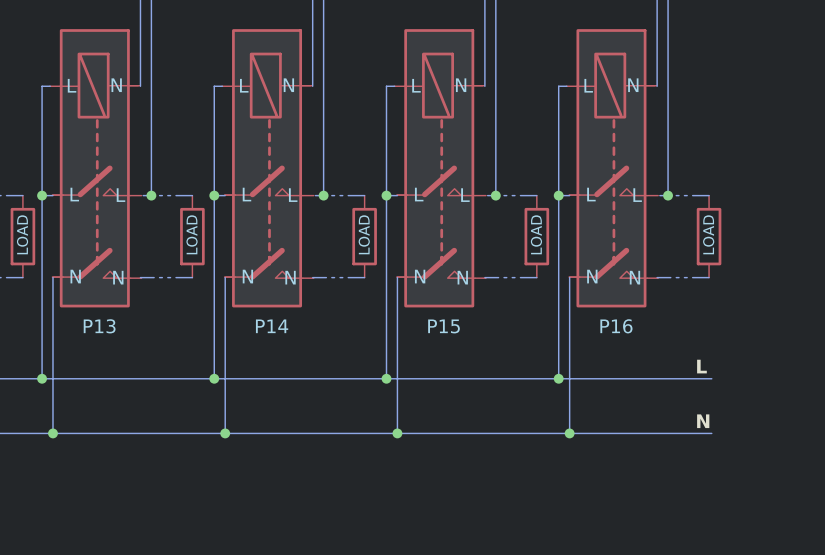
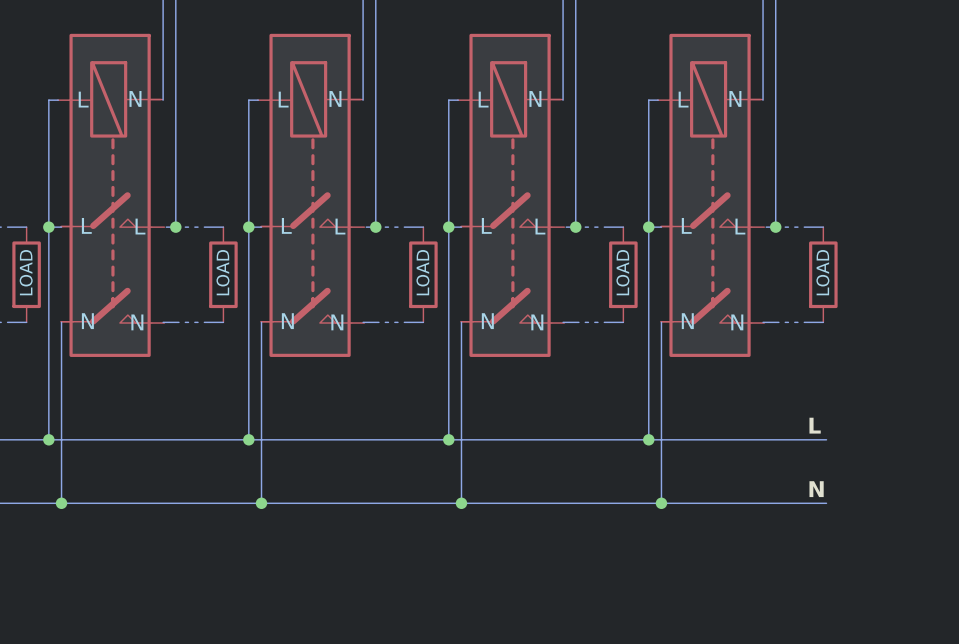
part value: P13 (99, 326) -> none
part value: P14 (272, 326) -> none
part value: P15 (443, 326) -> none
part value: P16 (616, 326) -> none

